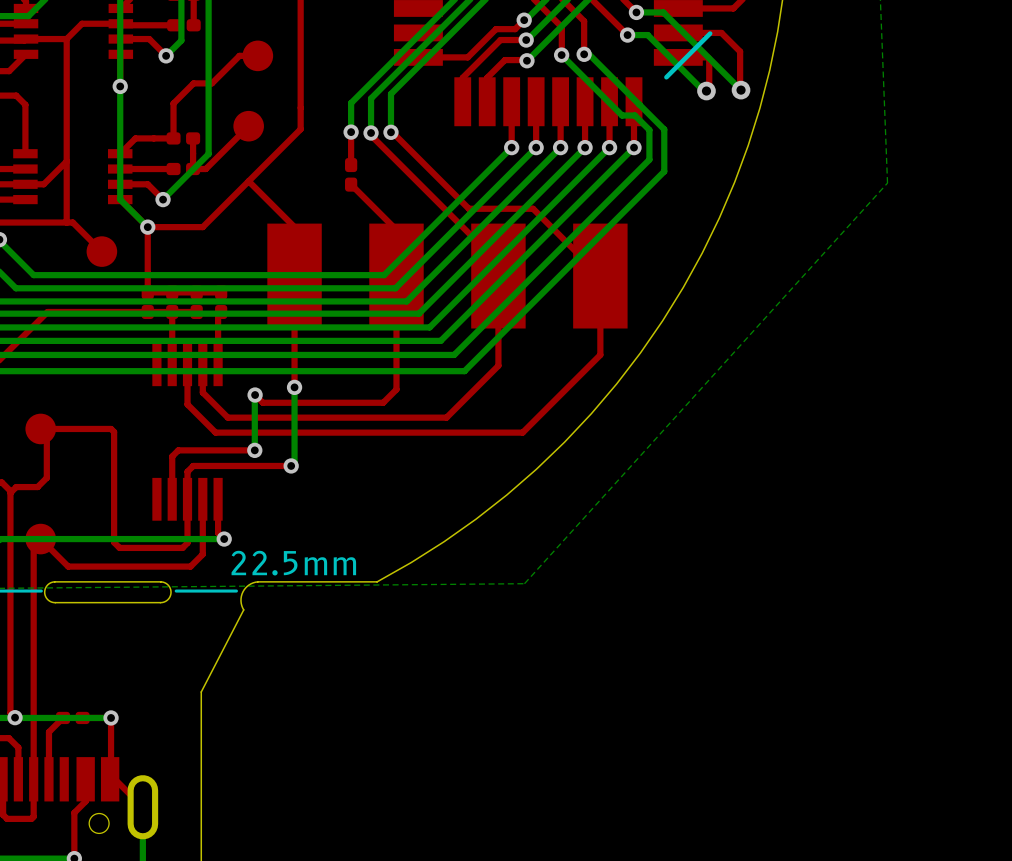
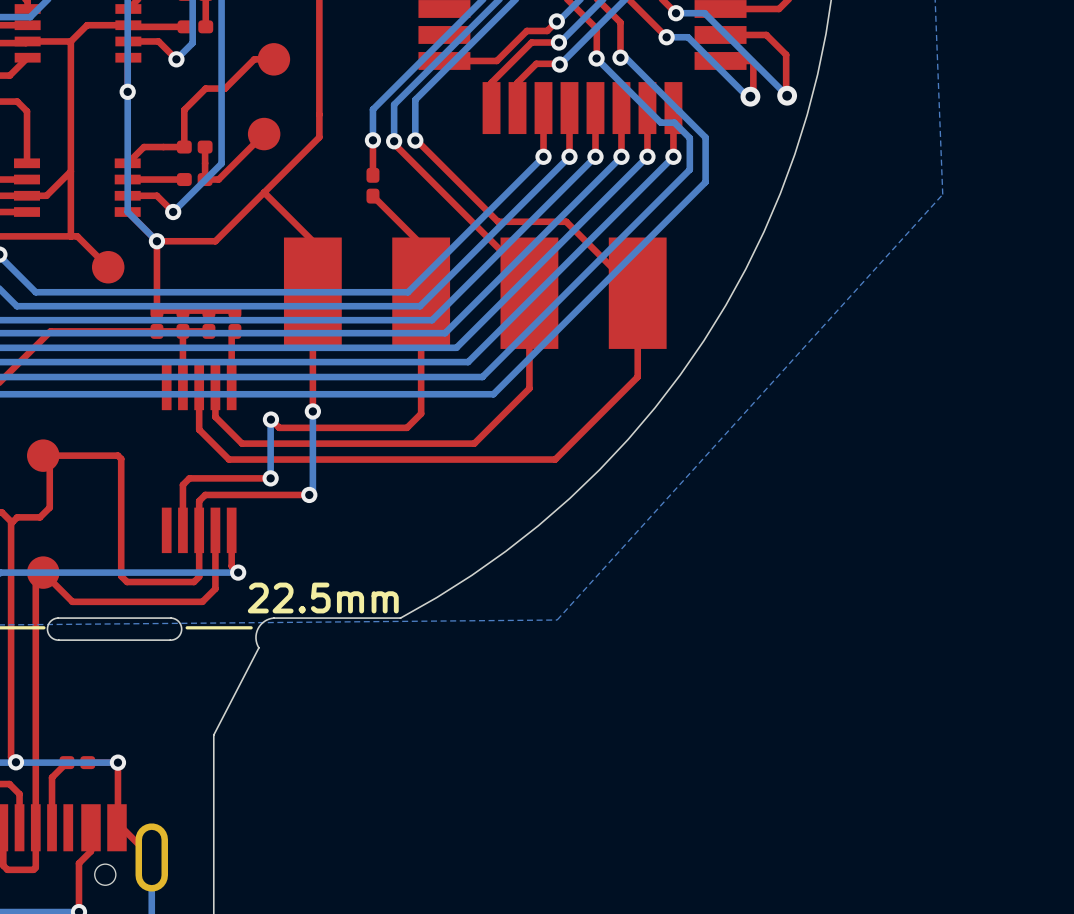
line: (710, 33) (666, 77) -> none

